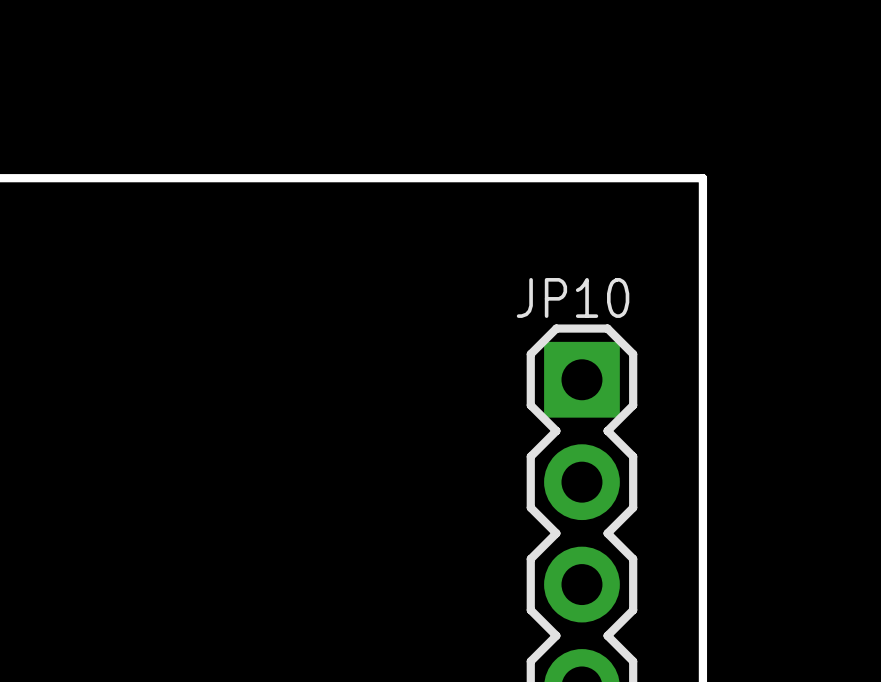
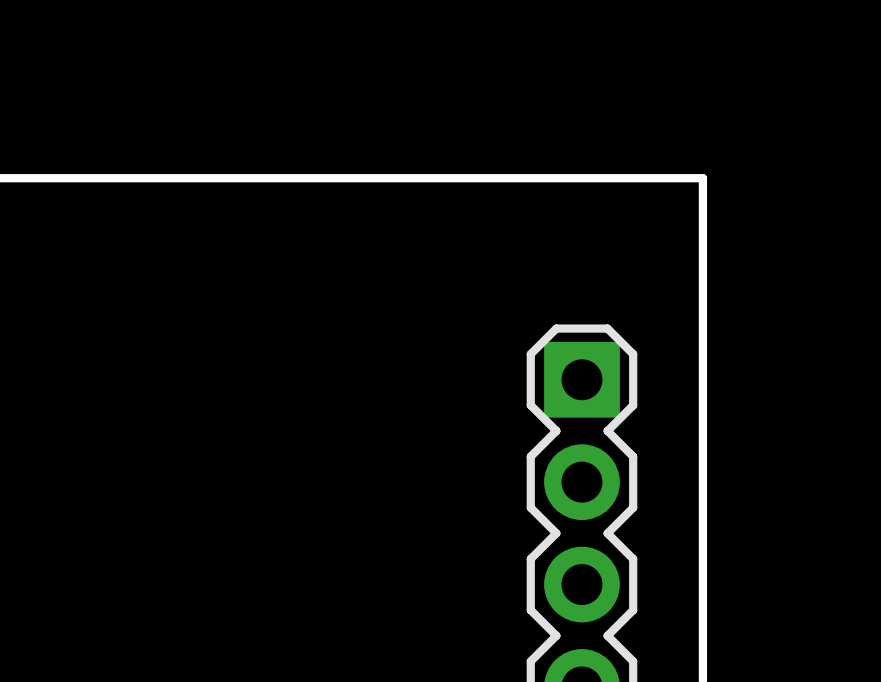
JP10 name: JP10 (573, 297) -> none

